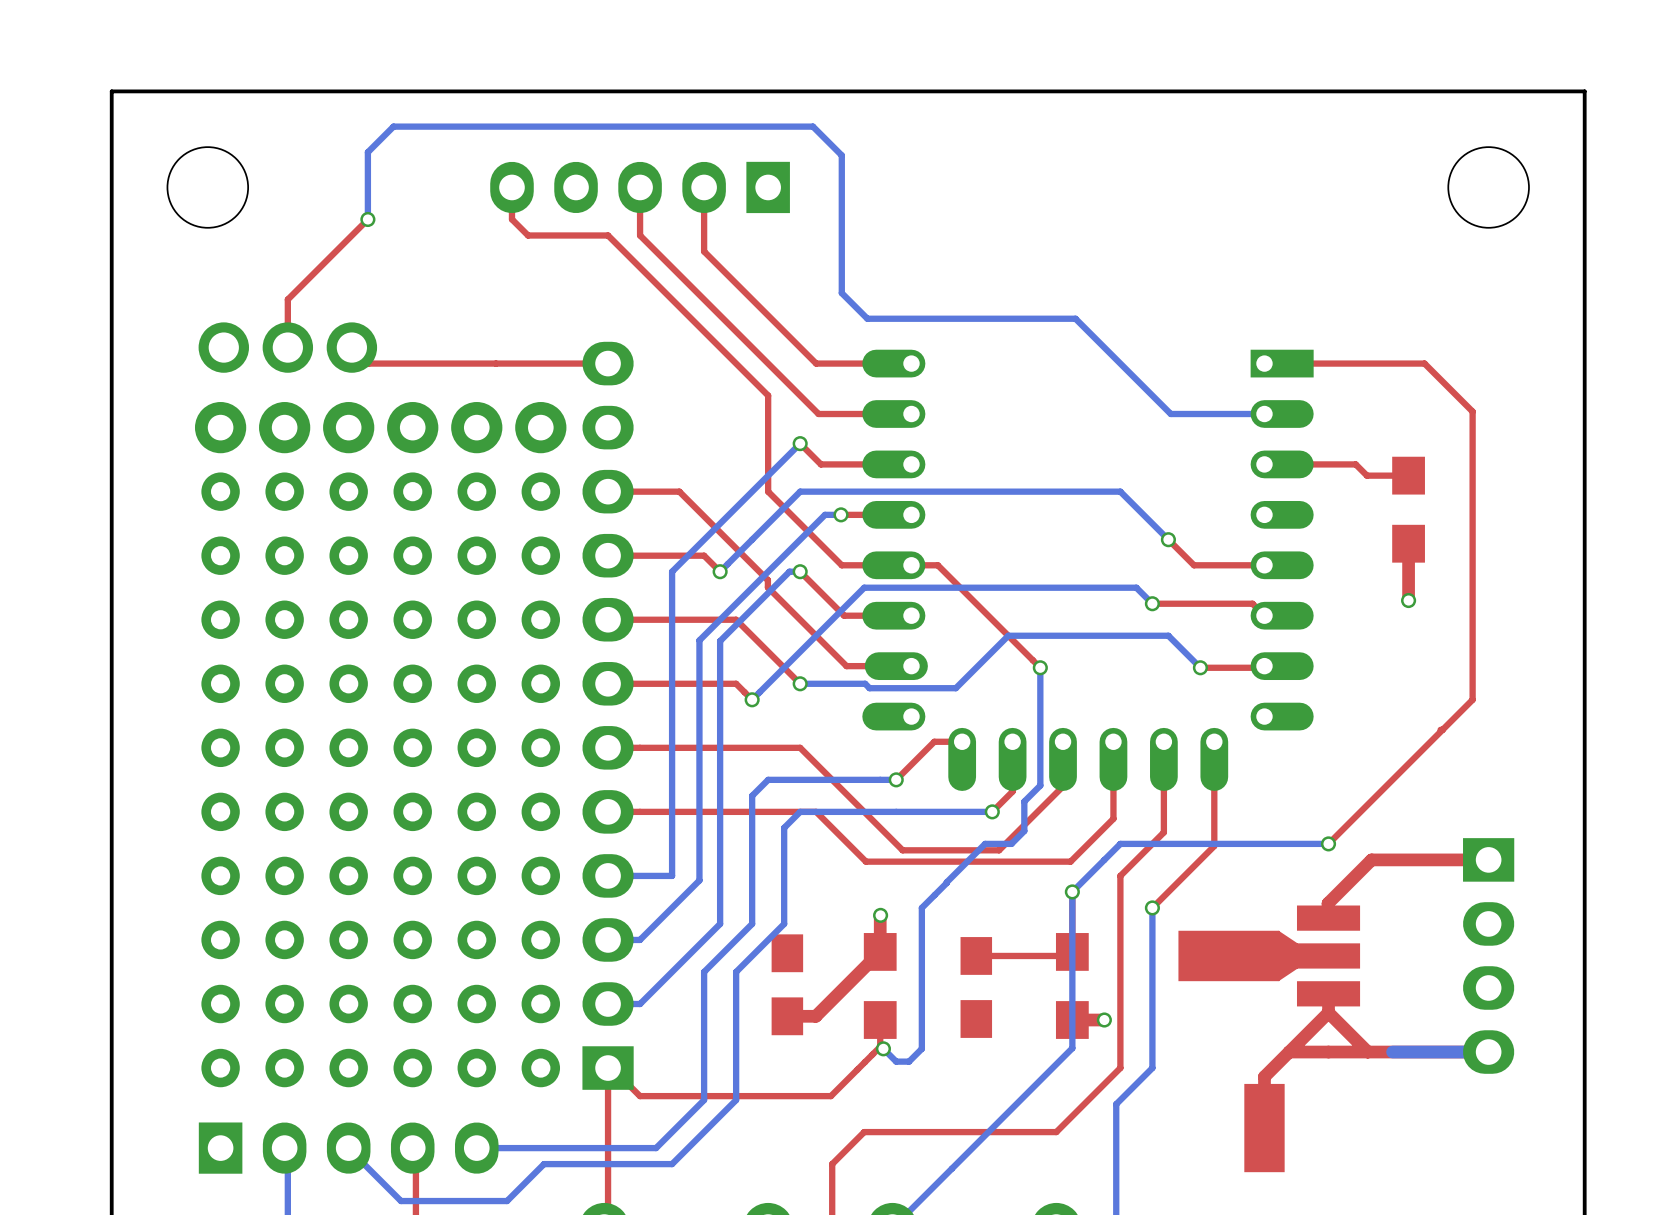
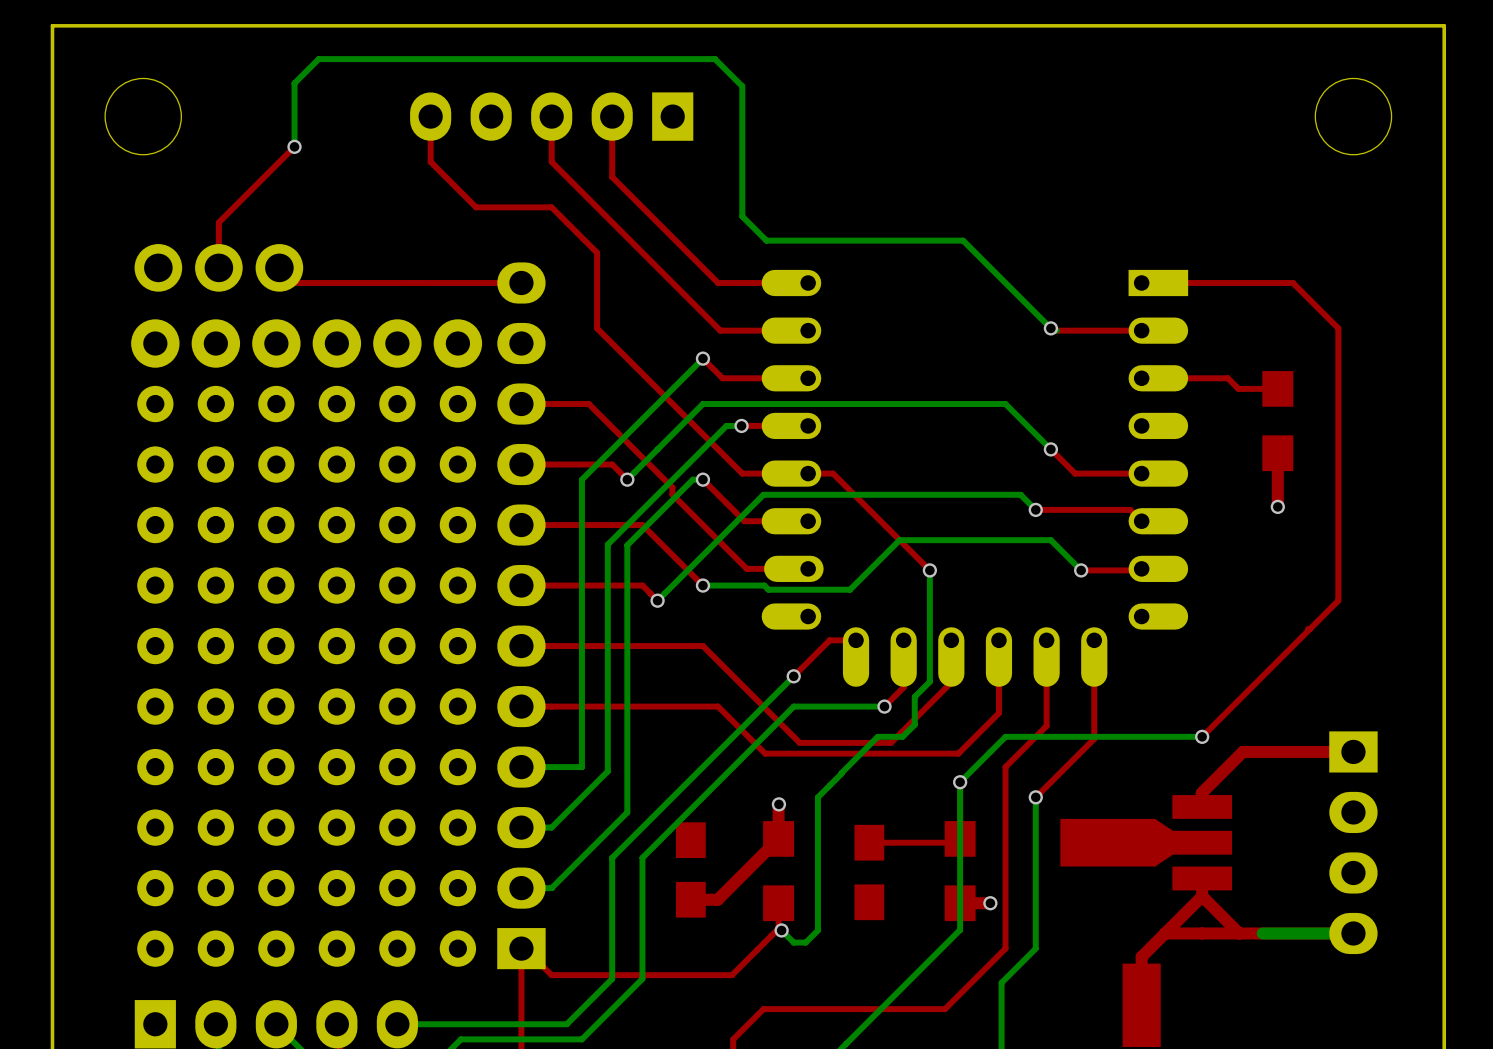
top track: (511, 219) (528, 235) (608, 235) (768, 395) (768, 491) -> (430, 146) (430, 161) (476, 207) (551, 207) (597, 252) (597, 328) (672, 404)
top track: none -> (1050, 328) (1053, 330) (1141, 330)
via: none -> (1050, 328)
bottom track: (1264, 414) (1174, 414) -> none
bottom track: (896, 779) (768, 779) (752, 795) (752, 923) -> (793, 676) (657, 812)
bottom track: (896, 811) (800, 811) (784, 827) (784, 923) -> (793, 706) (687, 812)

